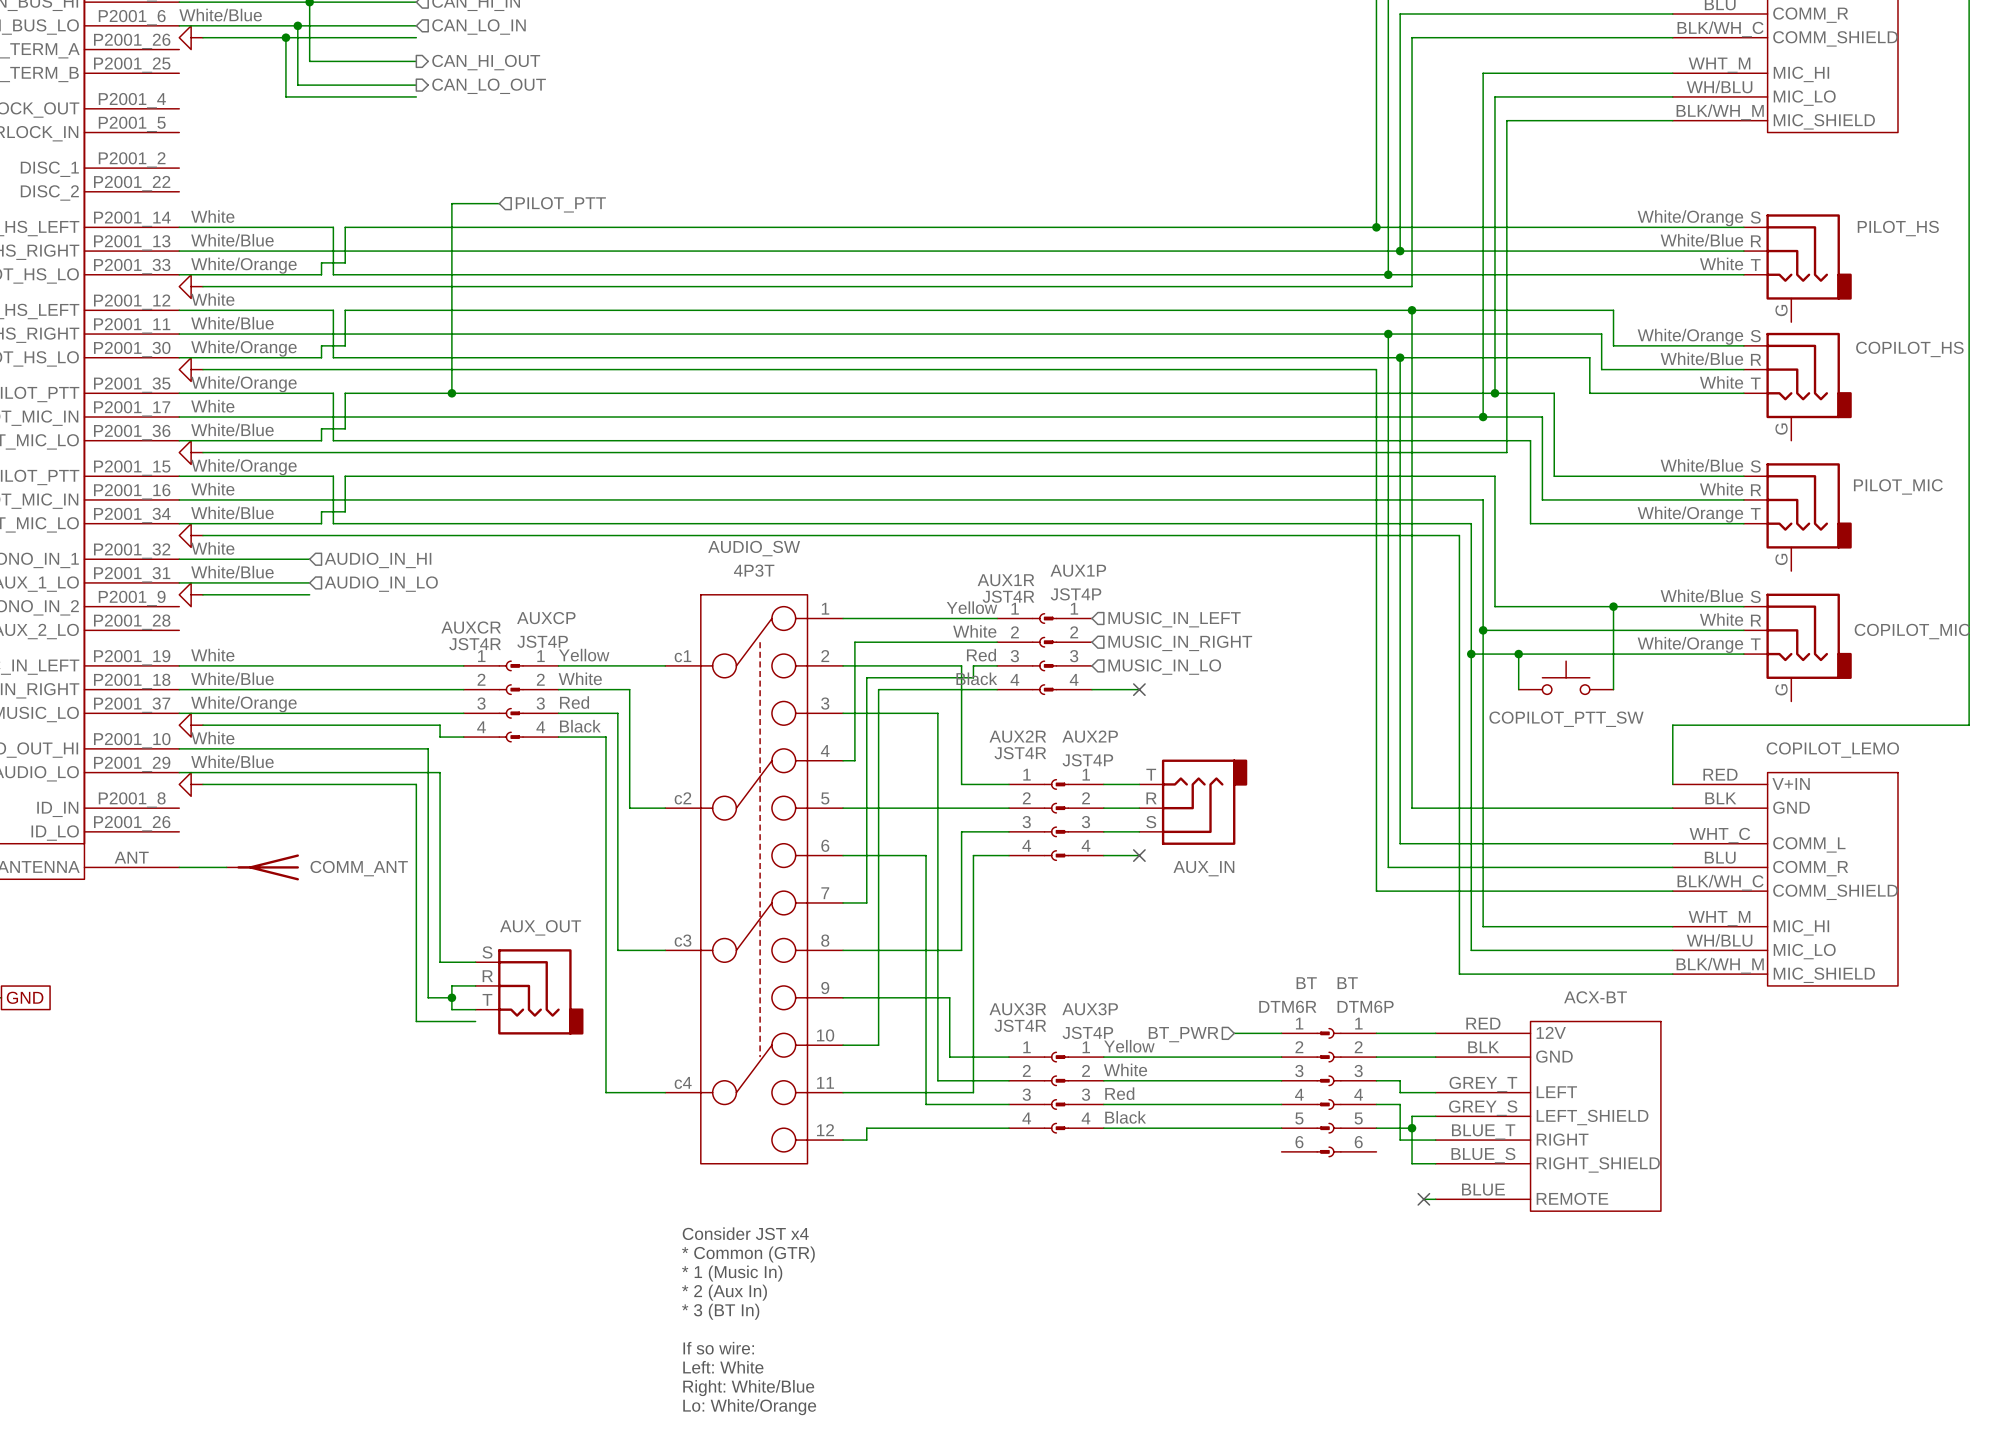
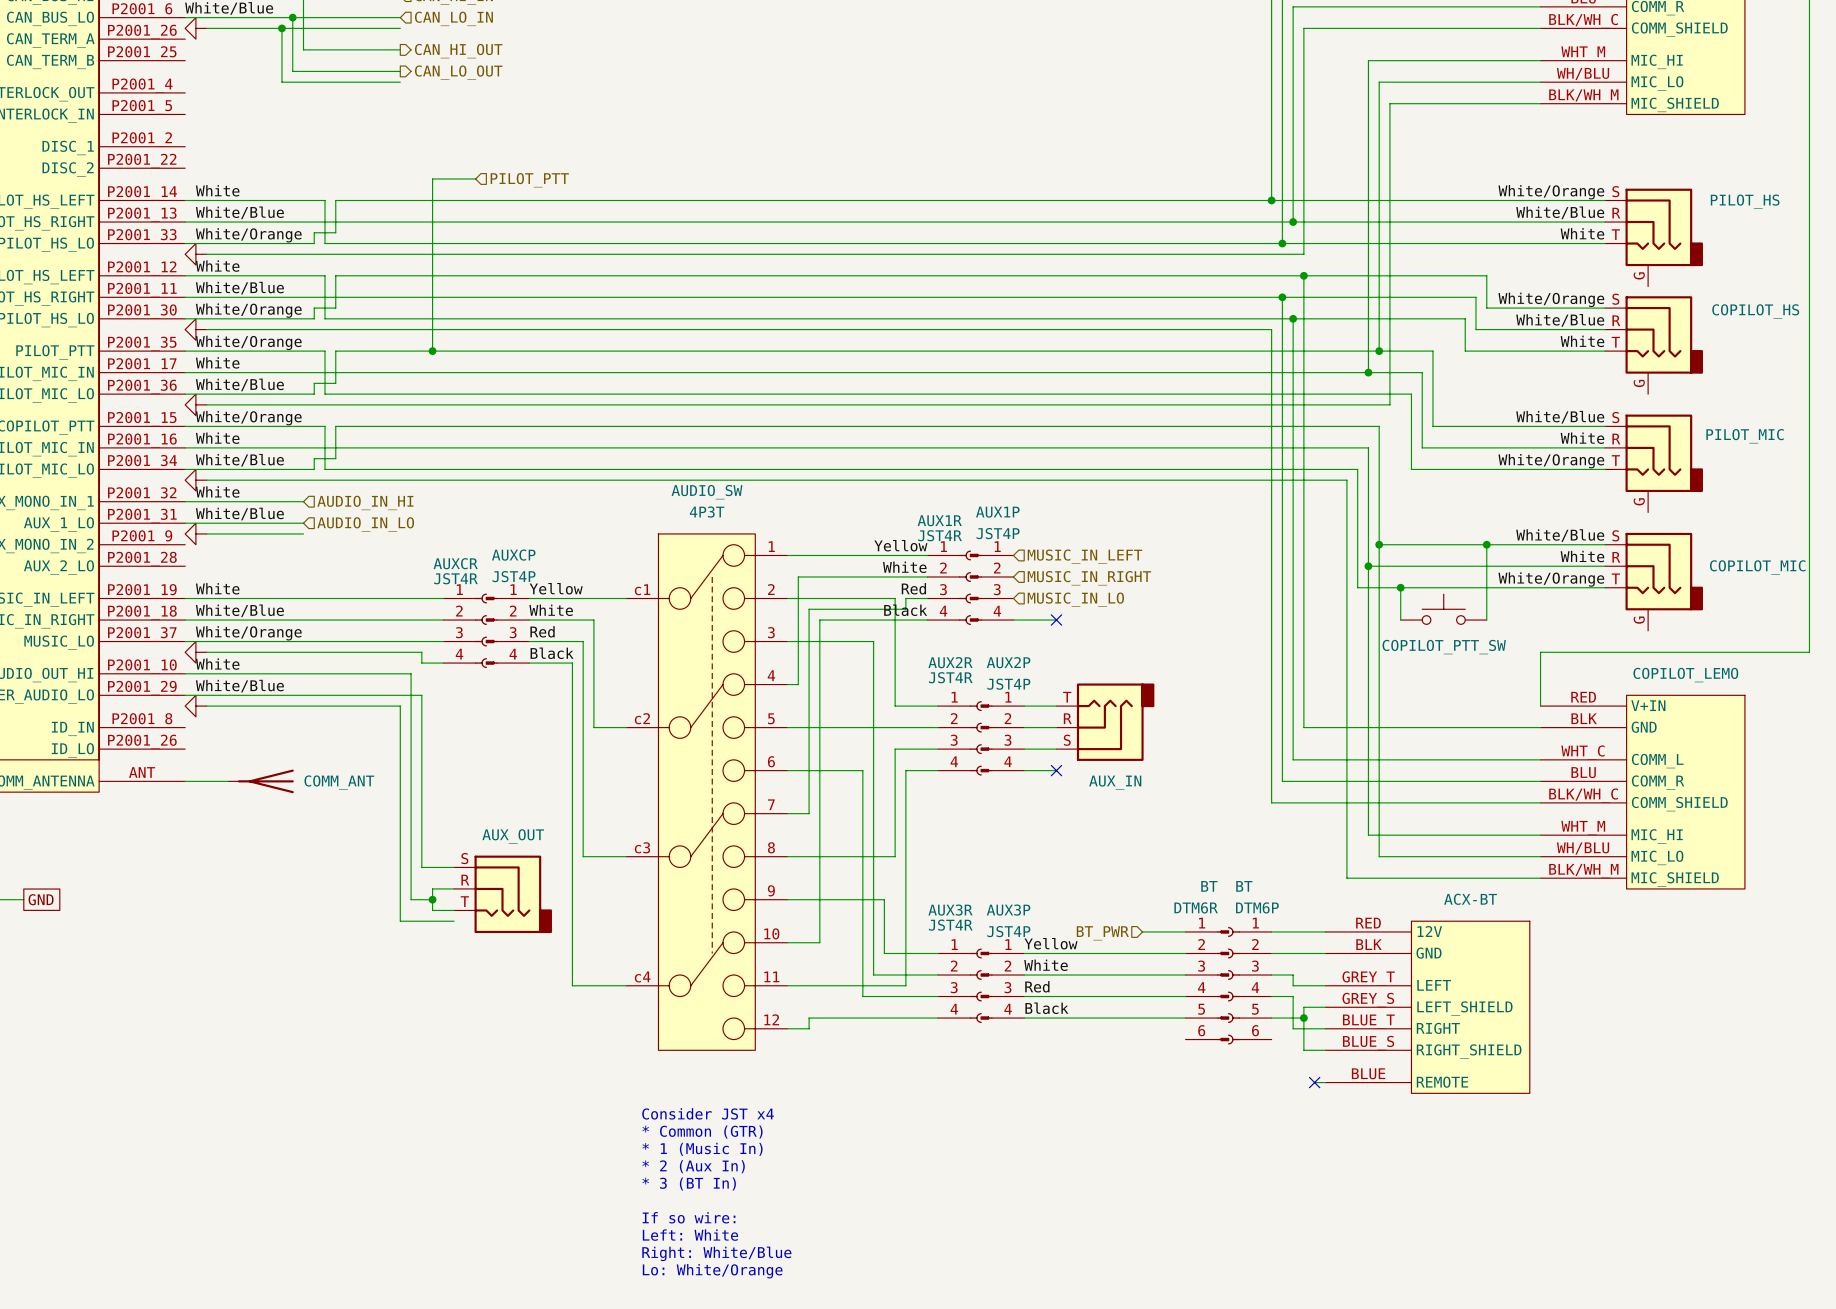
wire: (1471, 654) (1471, 950) (1494, 950) -> (1379, 544) (1379, 856)
junction position: (1471, 654) -> (1379, 544)

